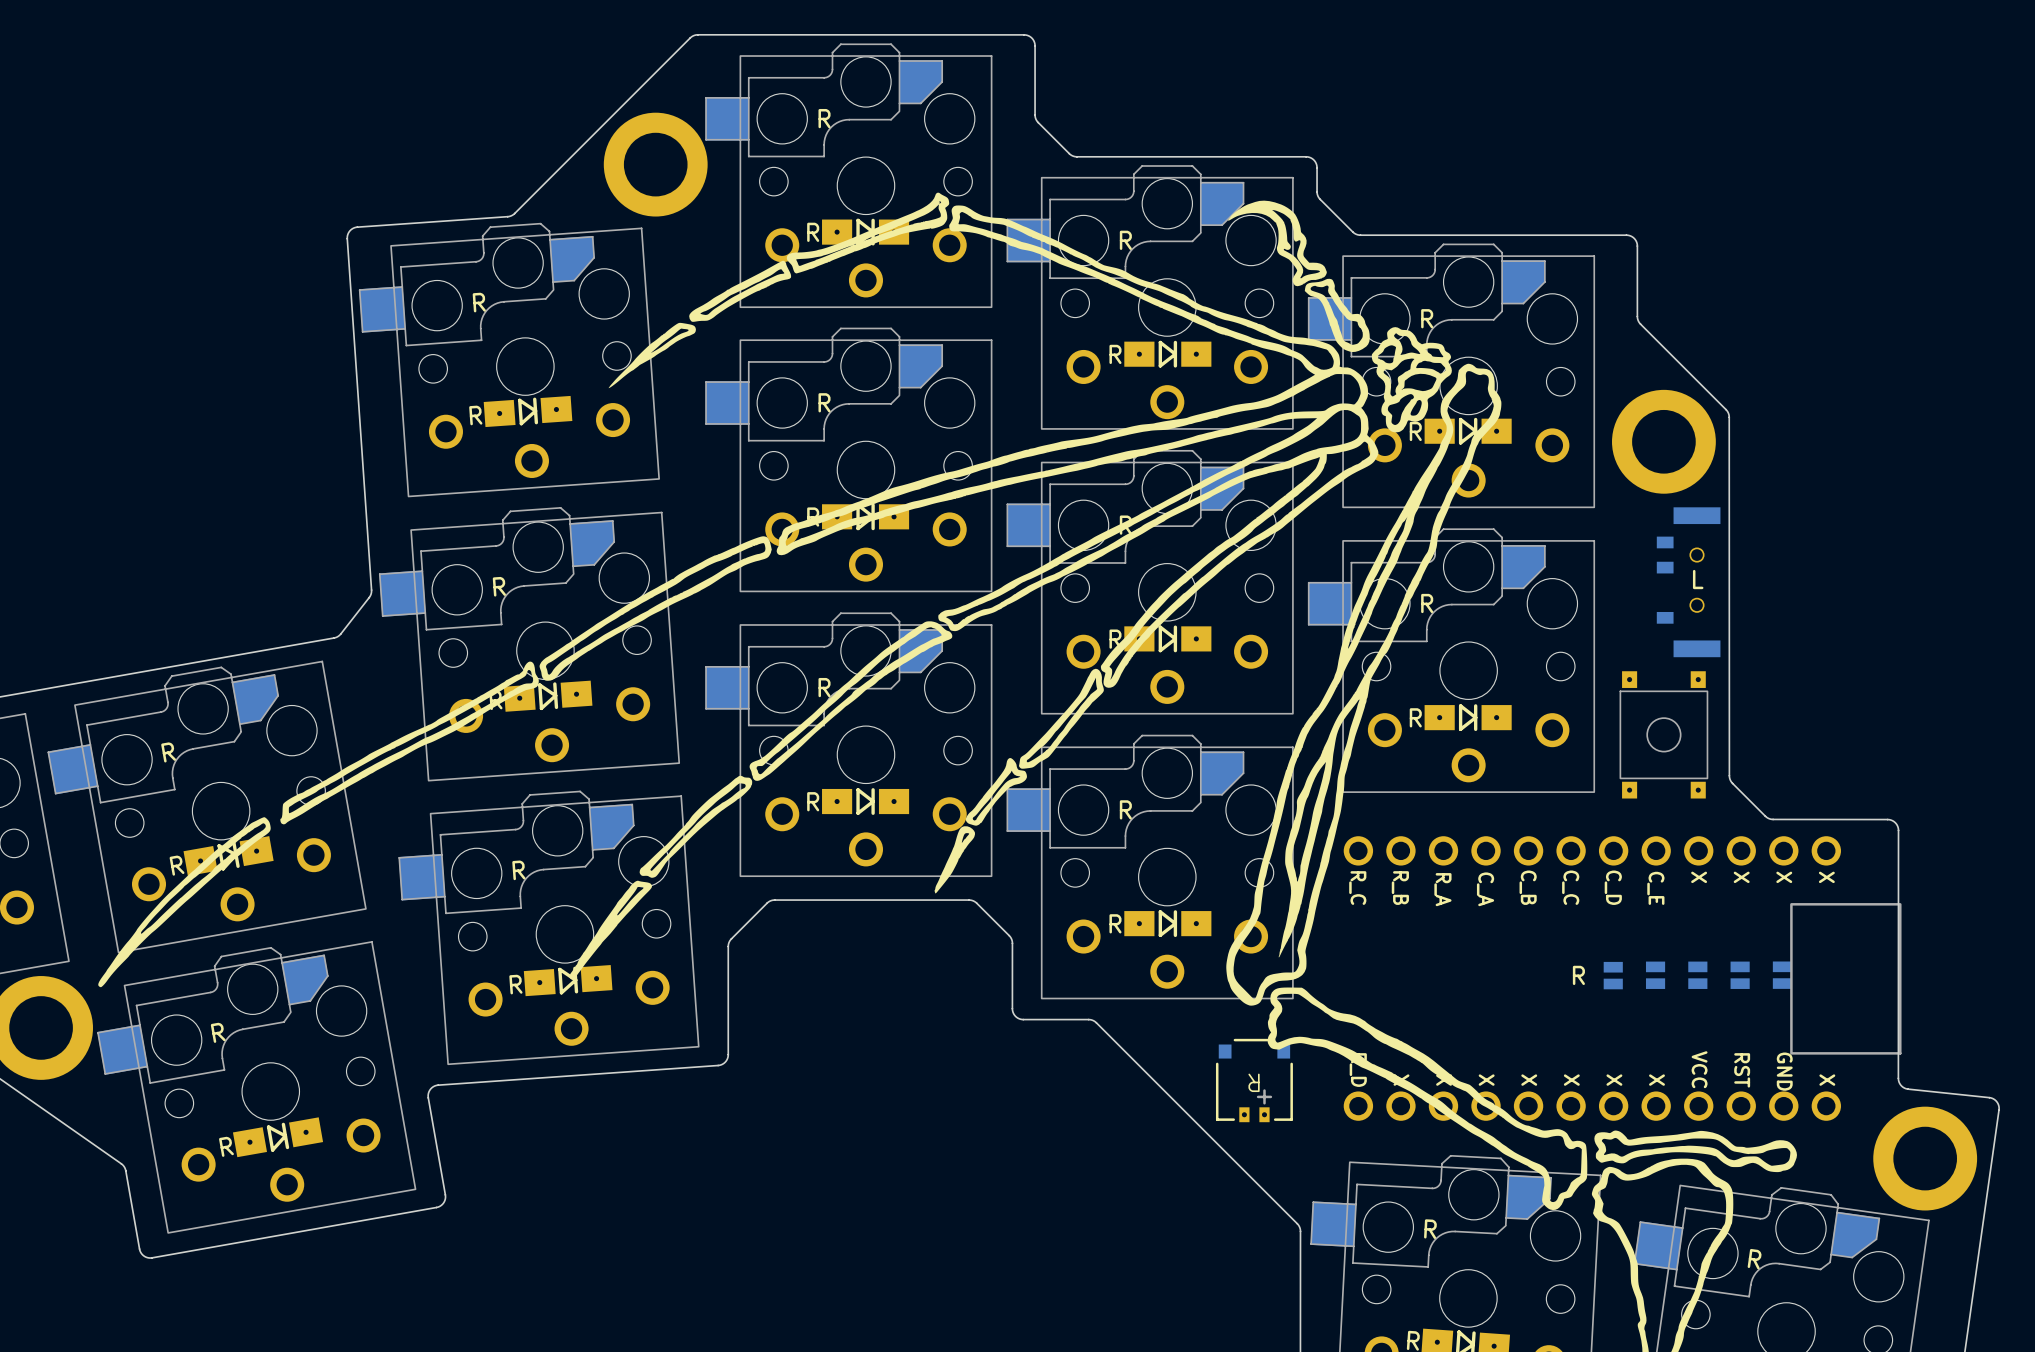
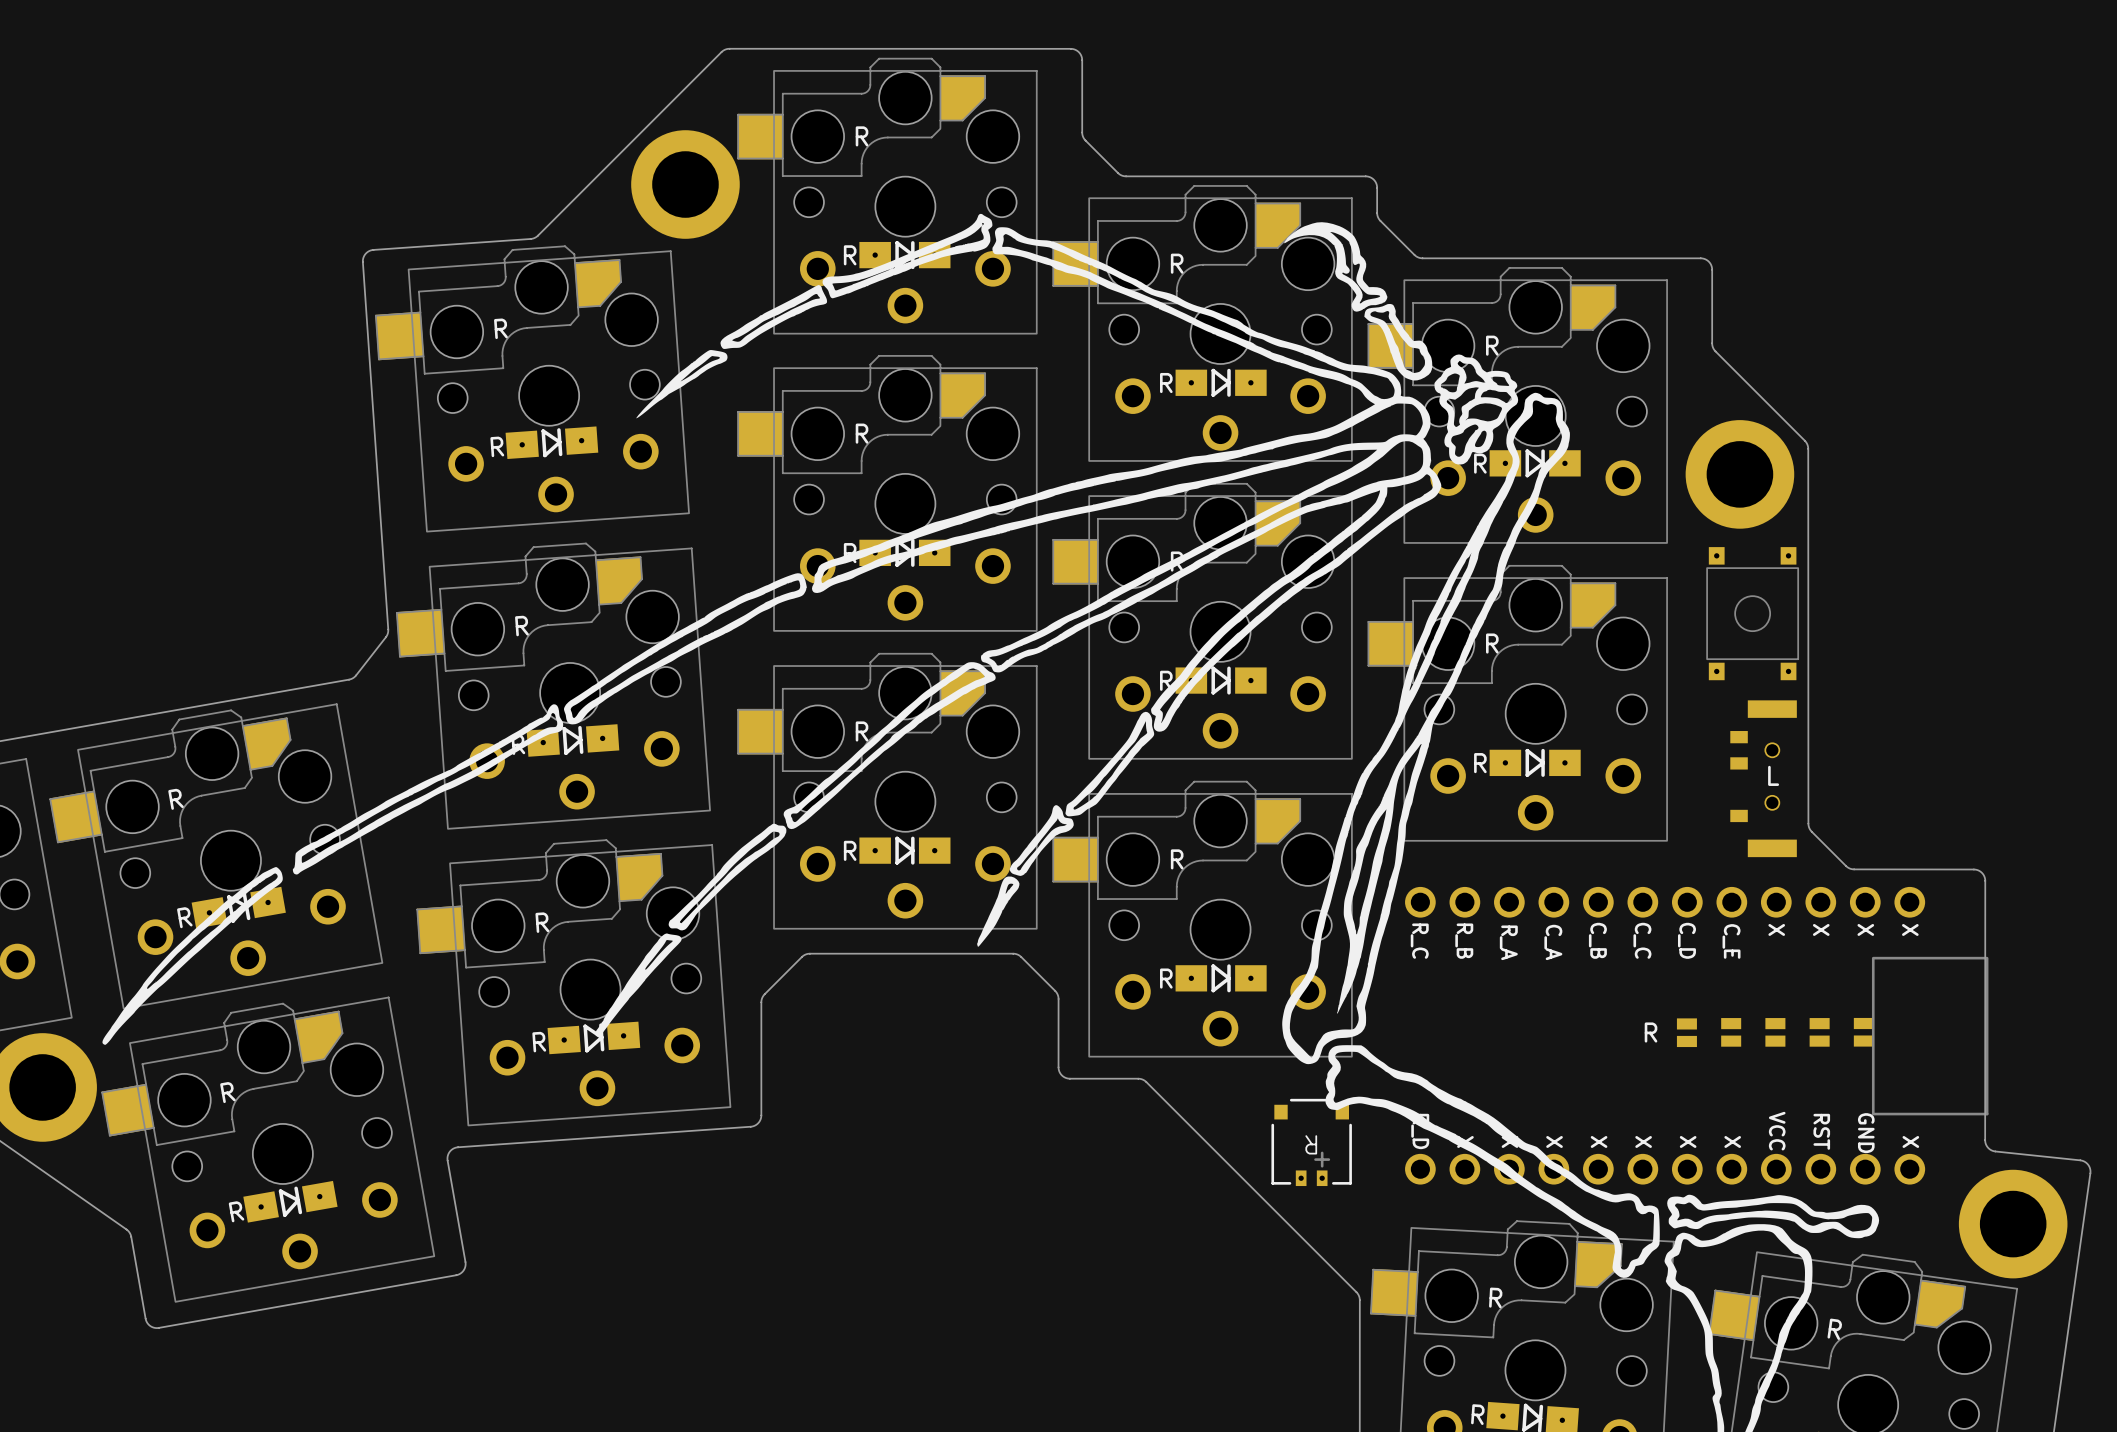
part footprint: [1656, 507, 1721, 658] -> [1706, 547, 1800, 681]
part: none -> (1763, 778)
part: (1663, 734) -> none

